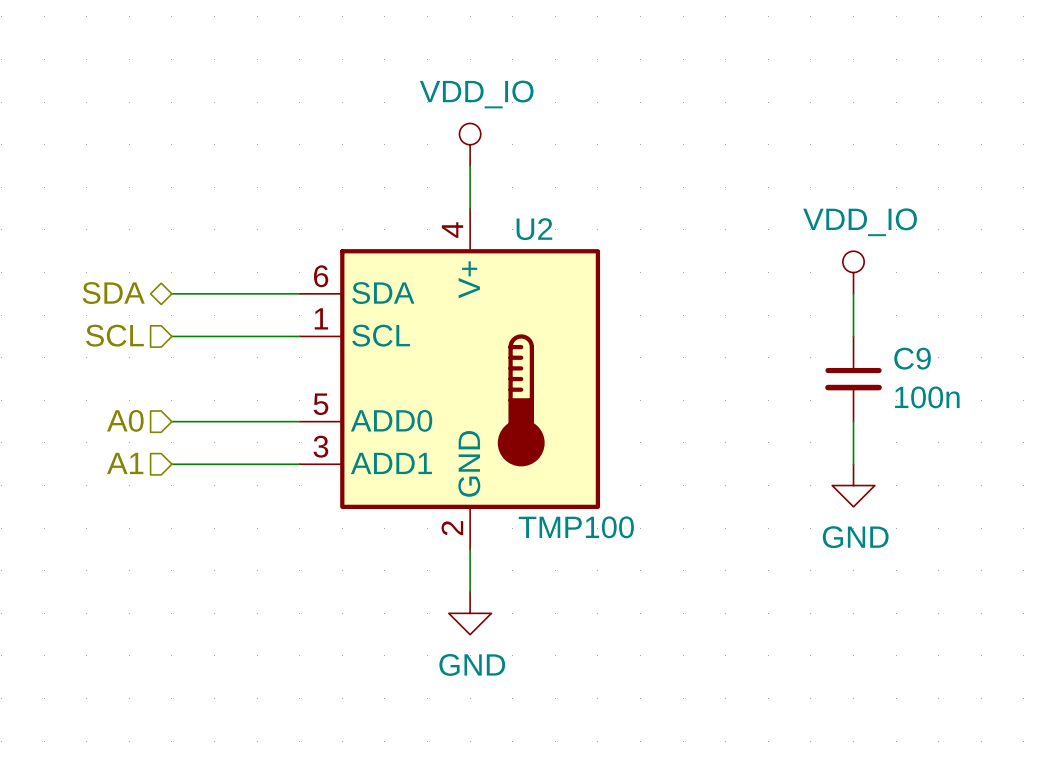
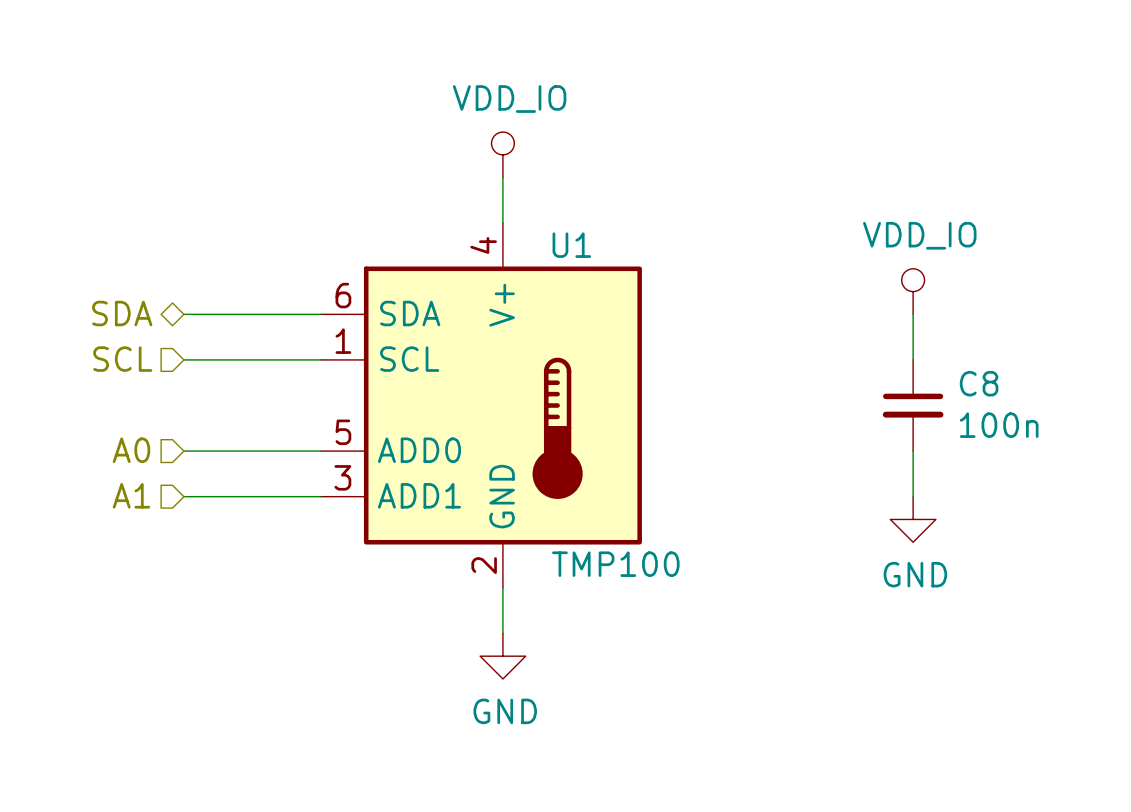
C9 name: C9 (912, 358) -> C8 (979, 383)
U2: TMP100 (449, 379) -> none
U1: none -> TMP100 (481, 405)

